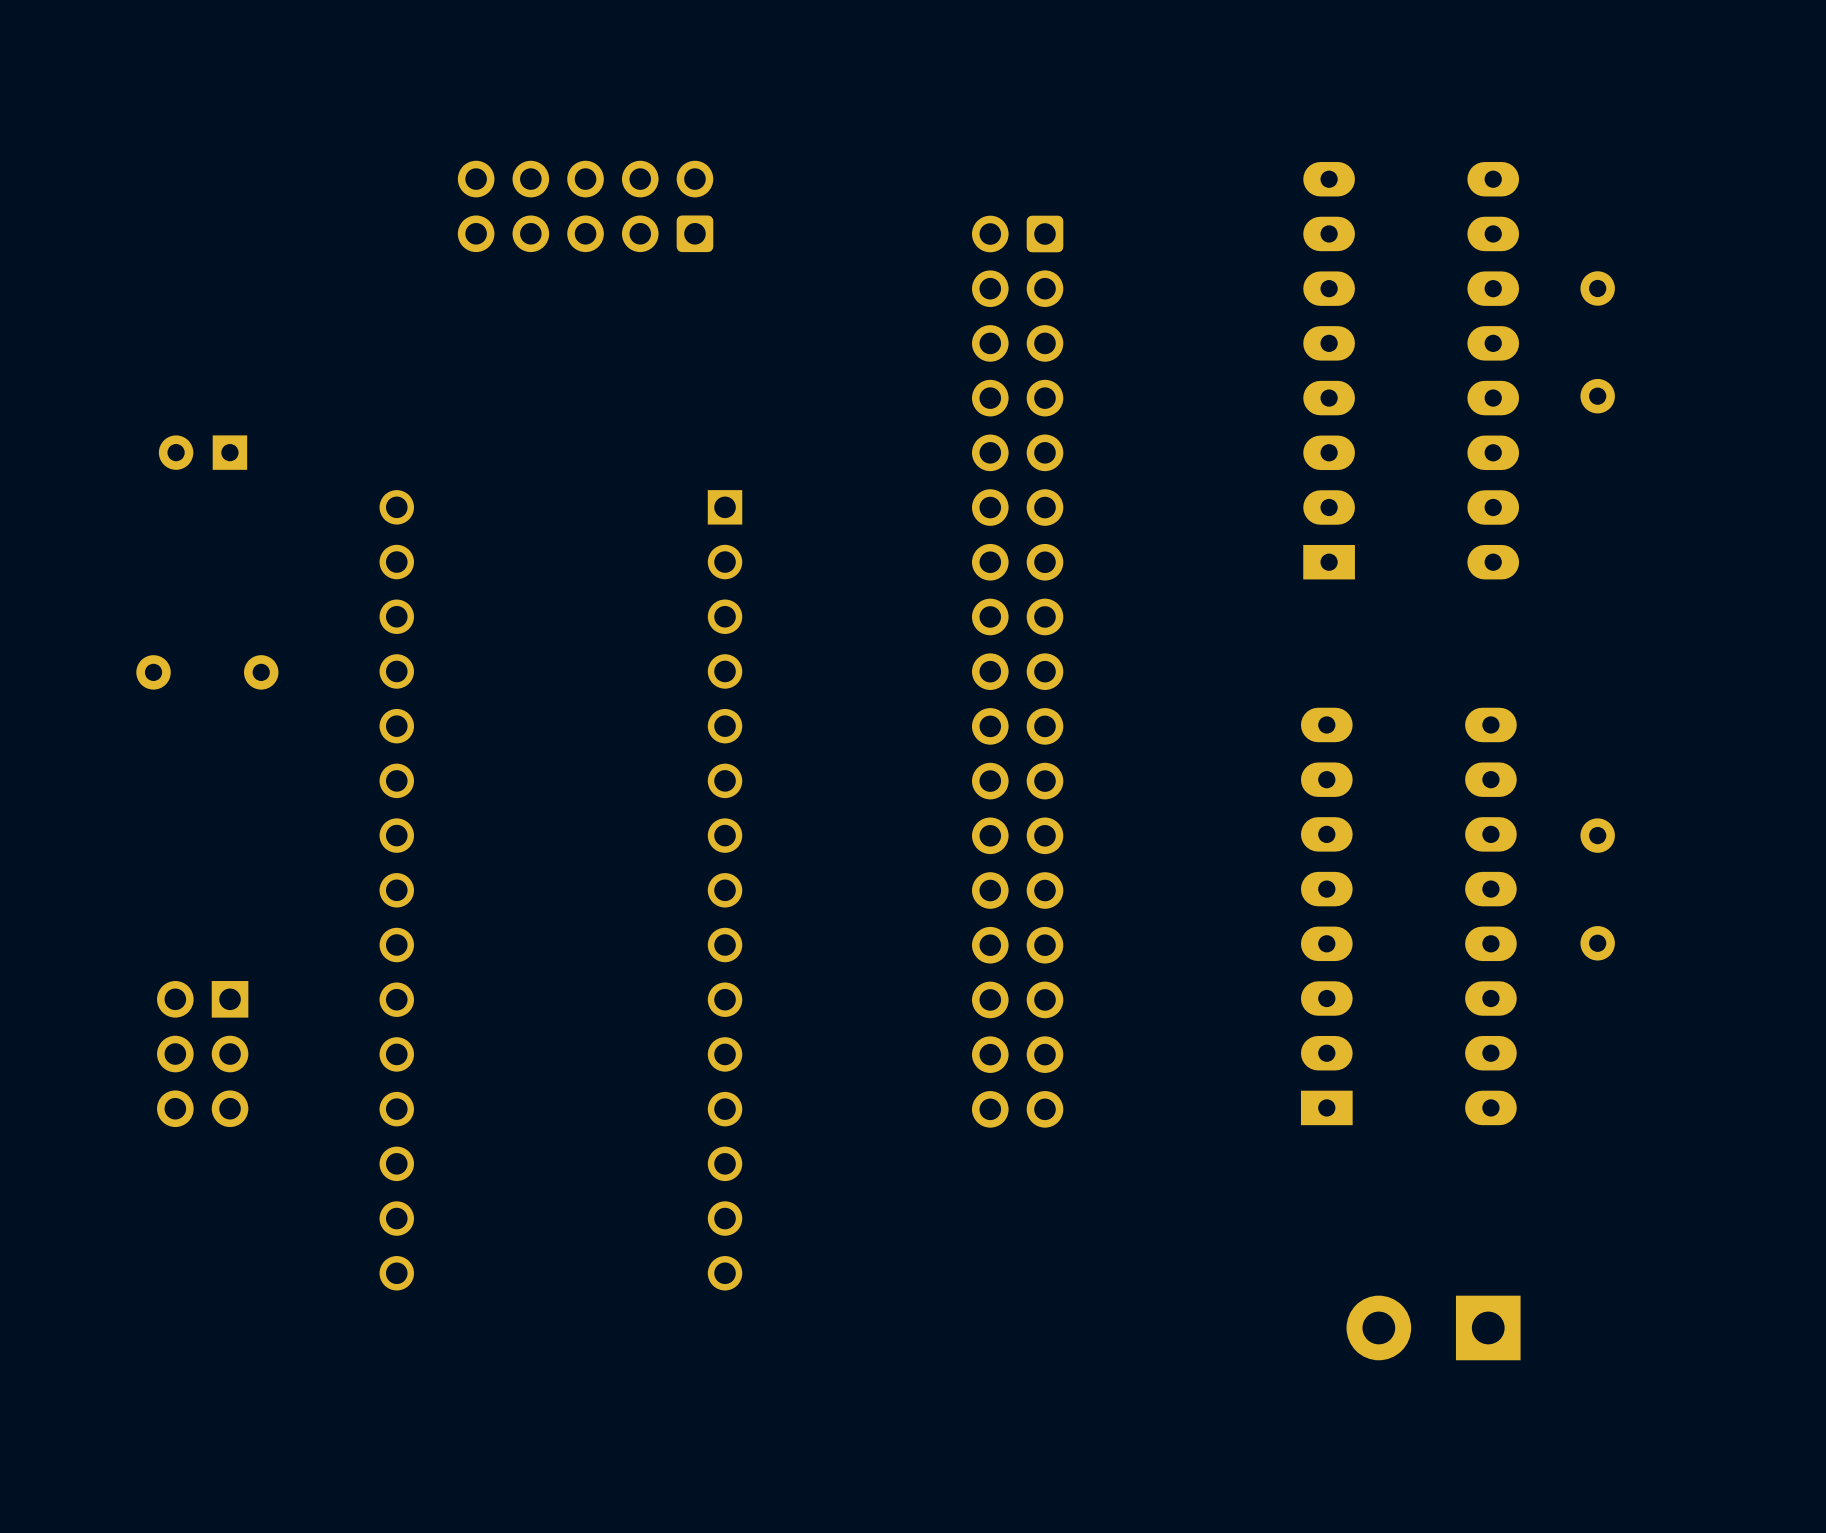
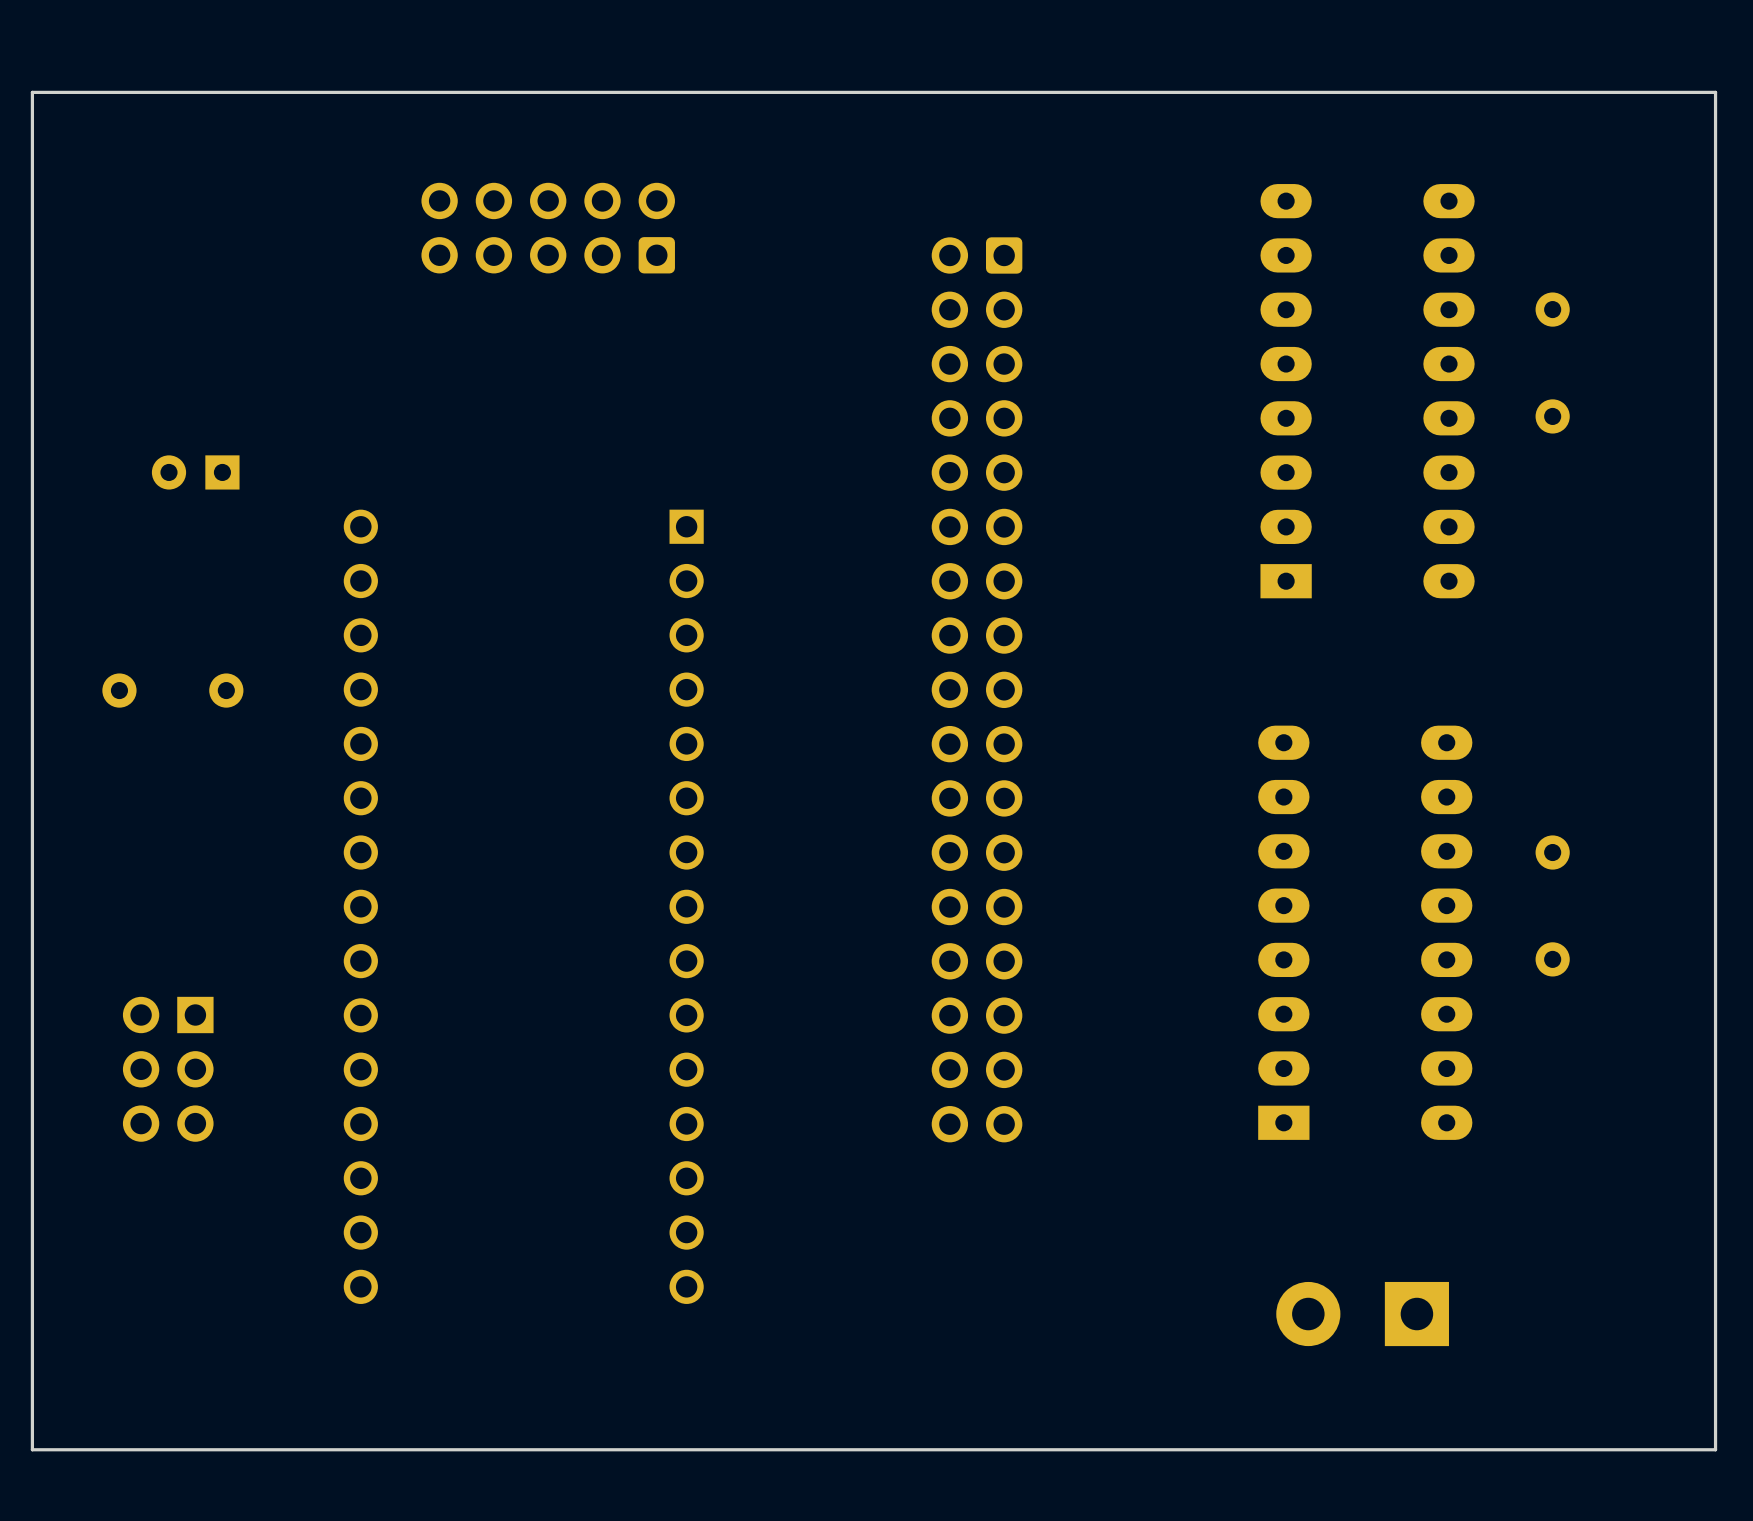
board edge: none -> (1715, 92) (32, 92) (32, 1449) (1715, 1449) (1715, 92)
part position: (203, 452) -> (195, 472)
part position: (1433, 1327) -> (1362, 1314)

